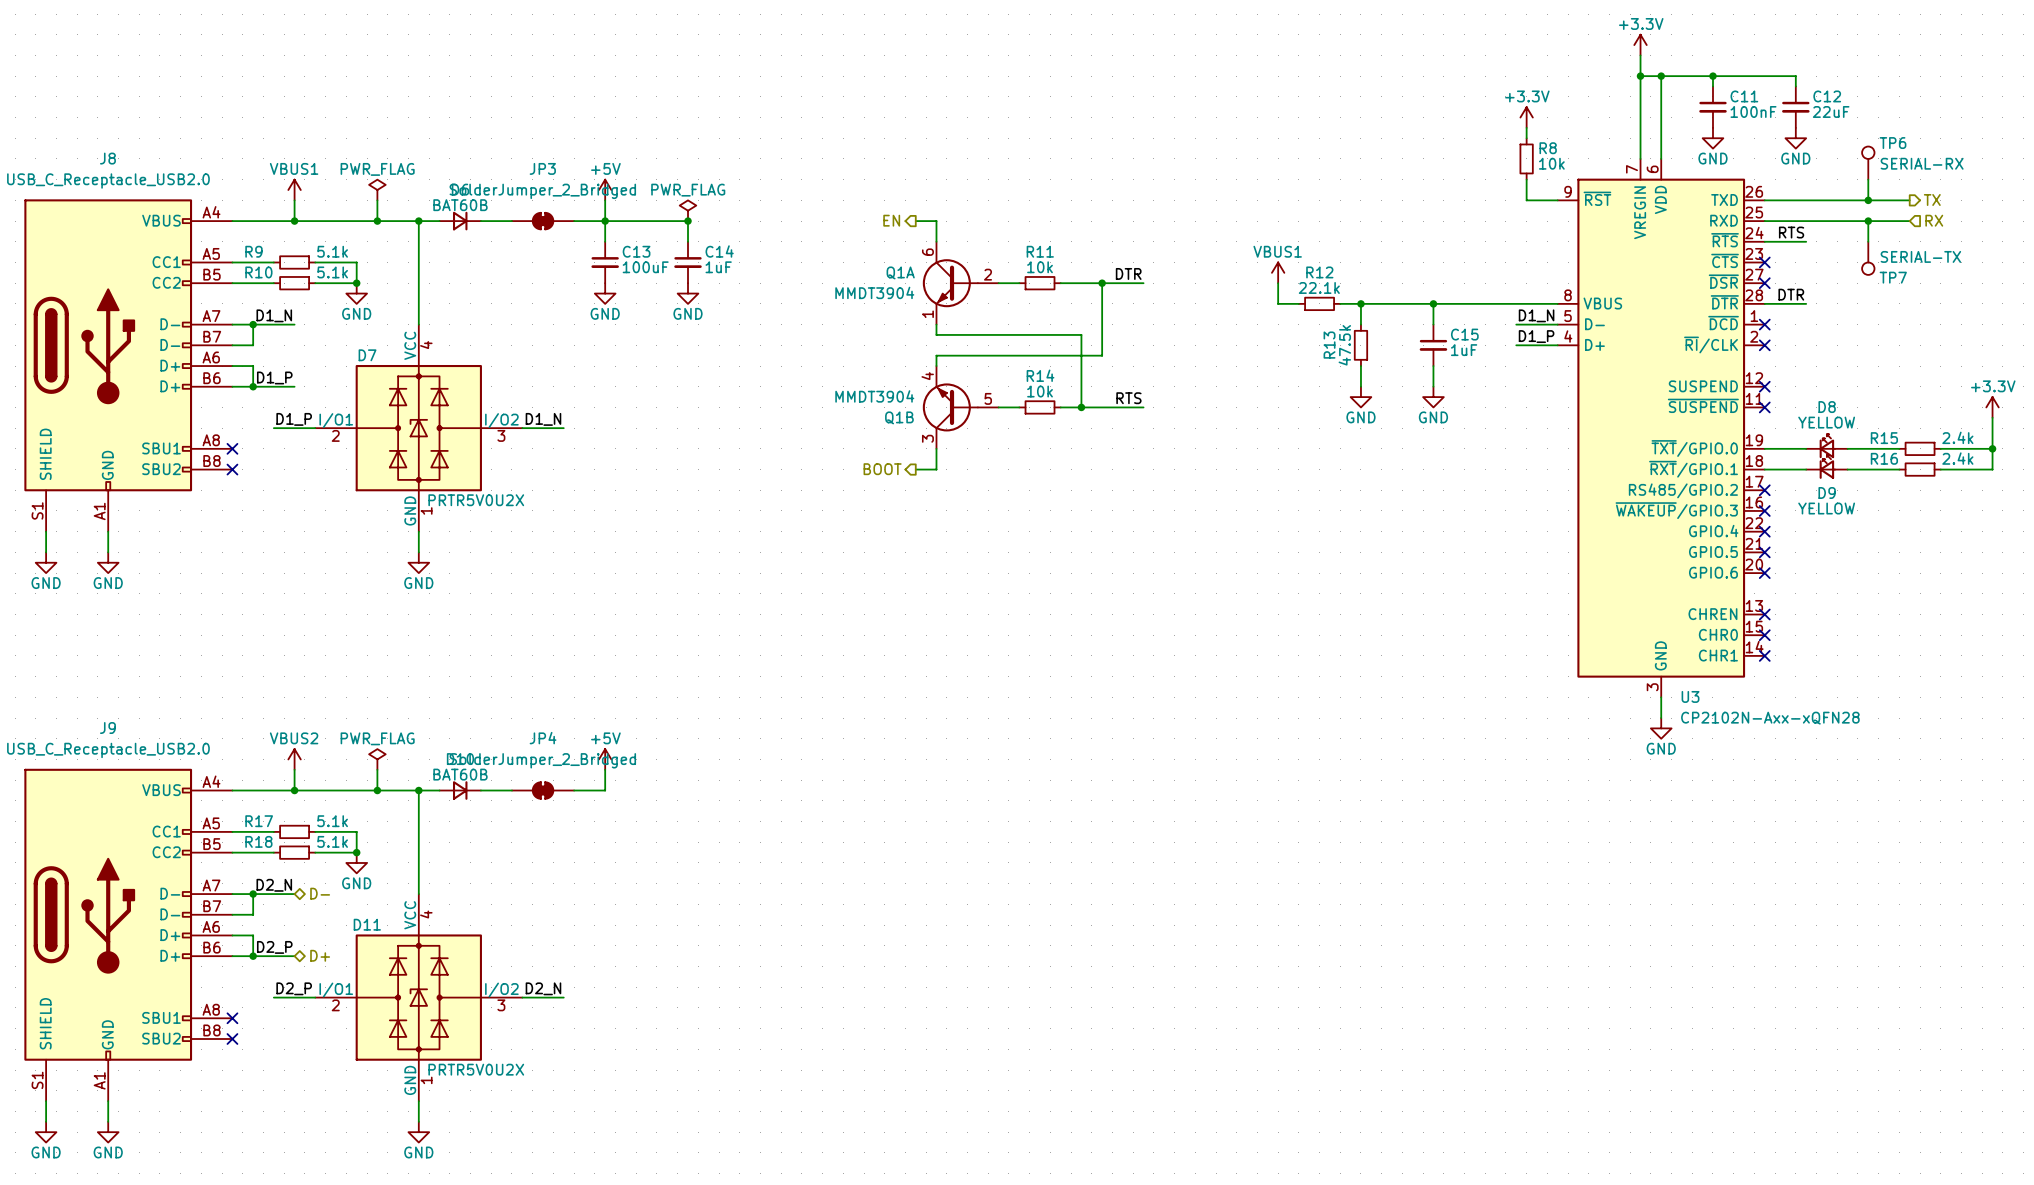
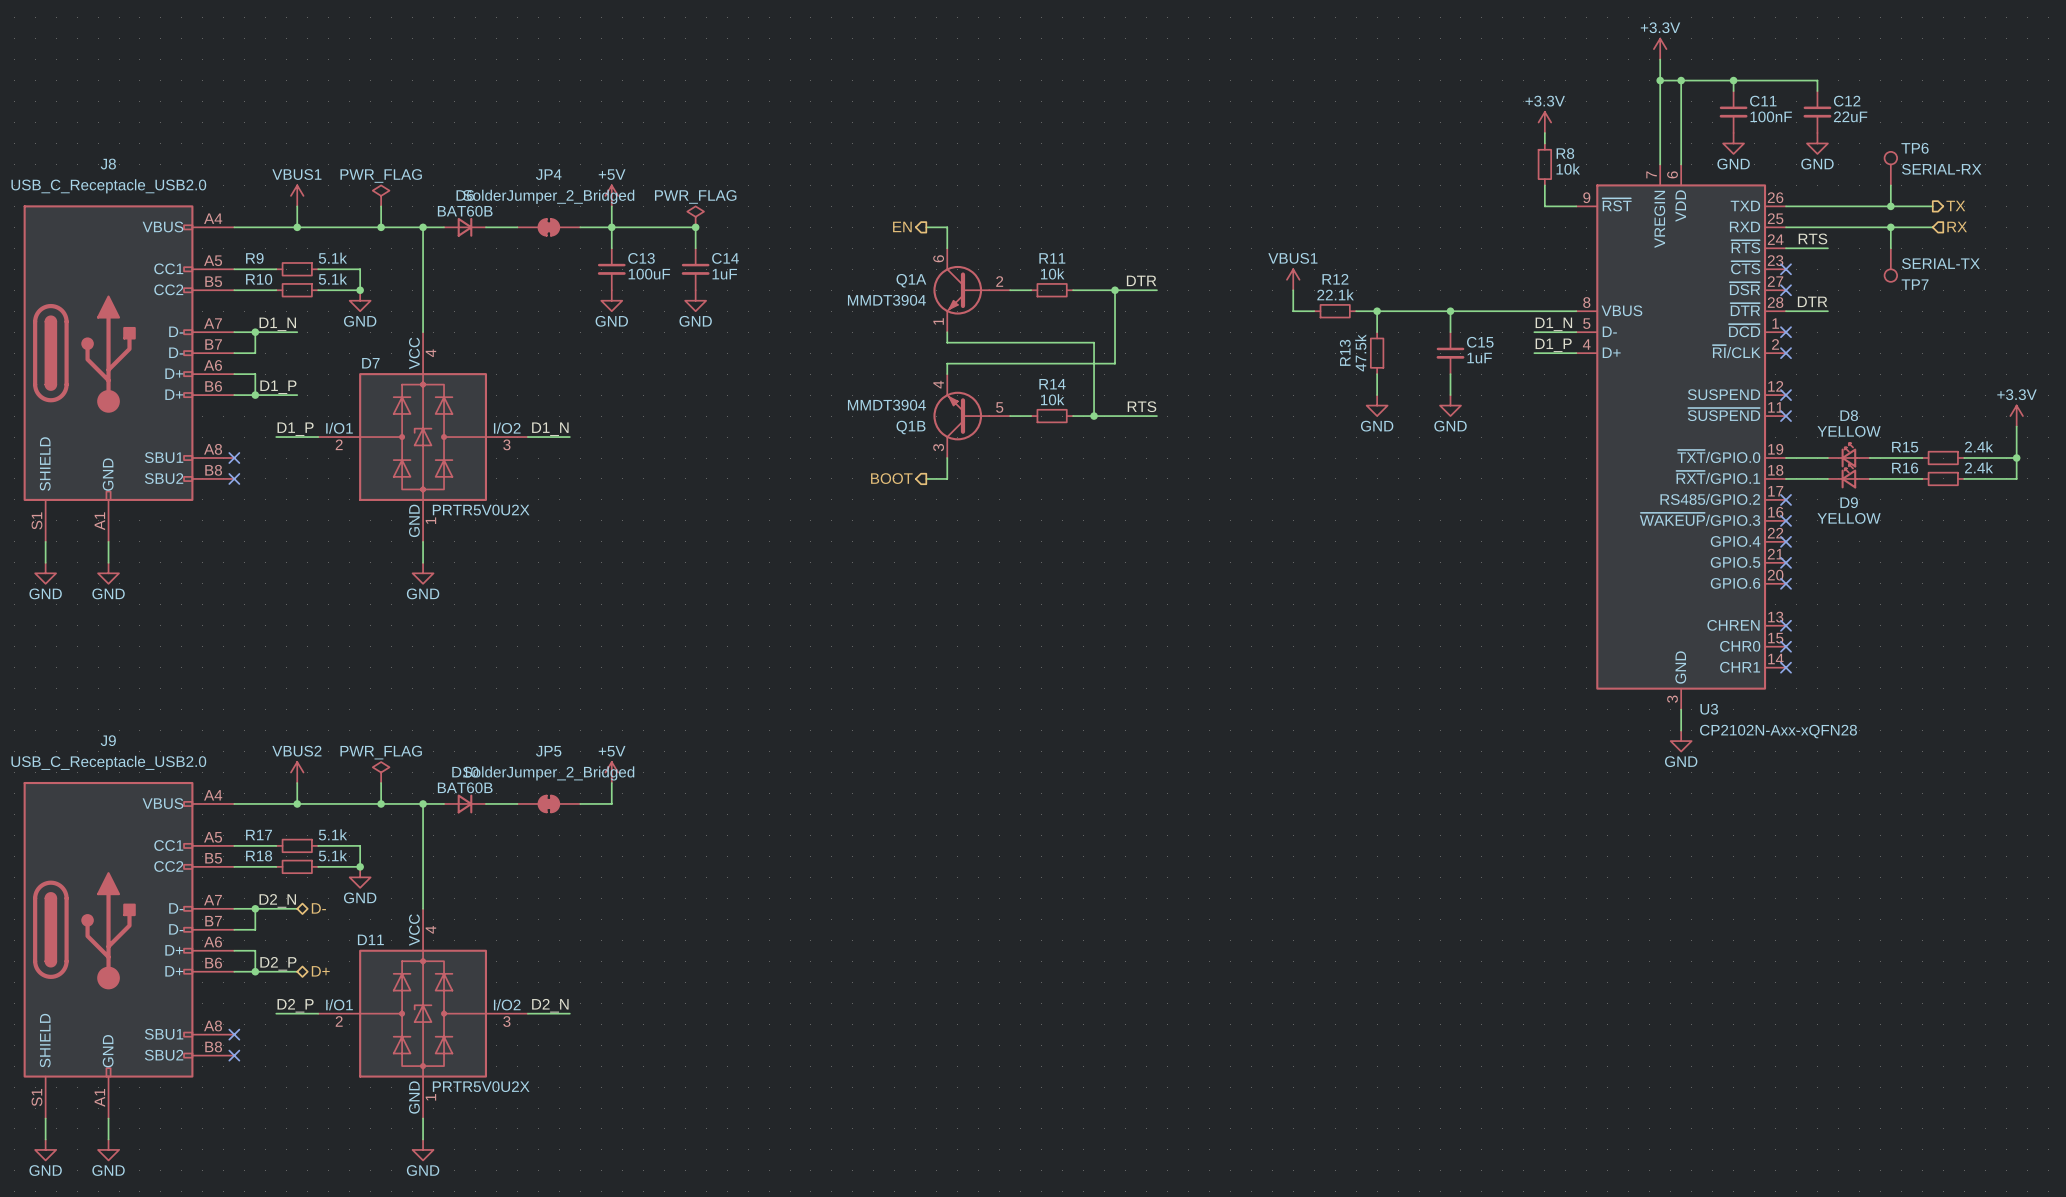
JP3 name: JP3 (542, 168) -> JP4 (548, 174)
JP4 name: JP4 (543, 738) -> JP5 (548, 751)

